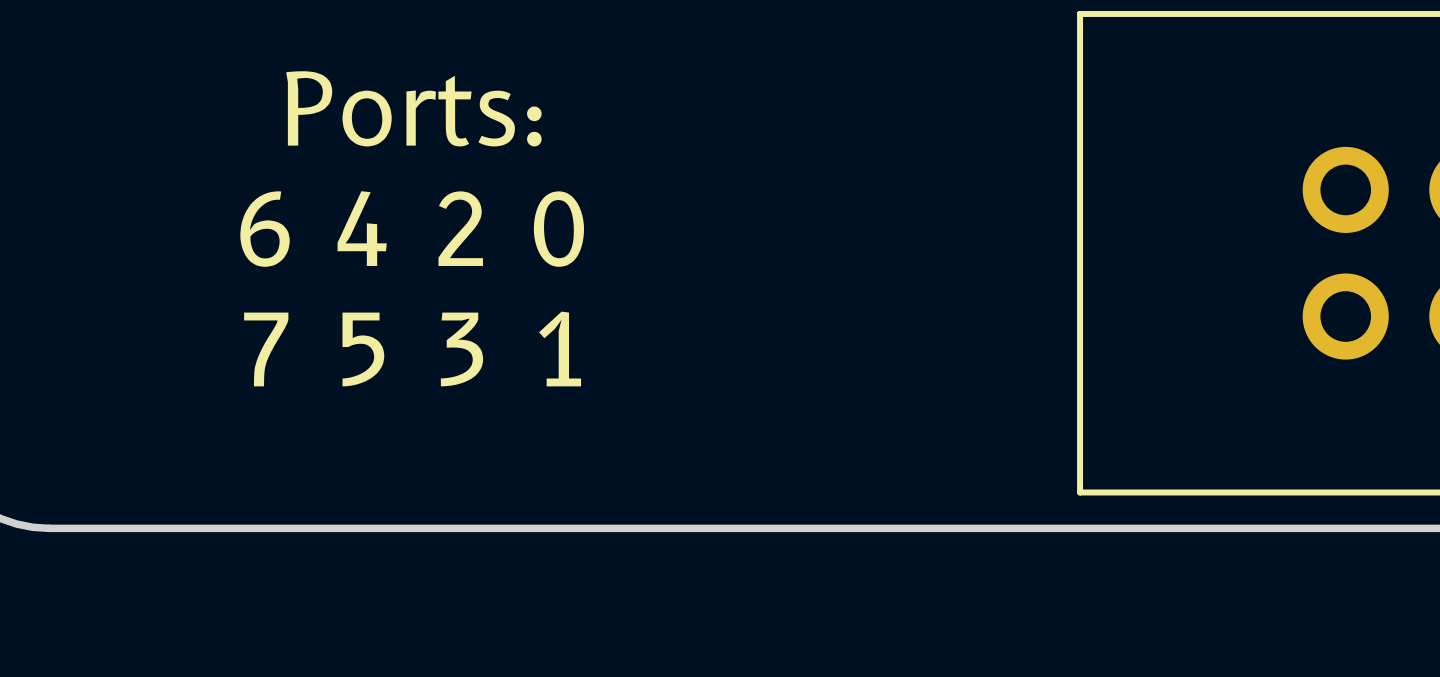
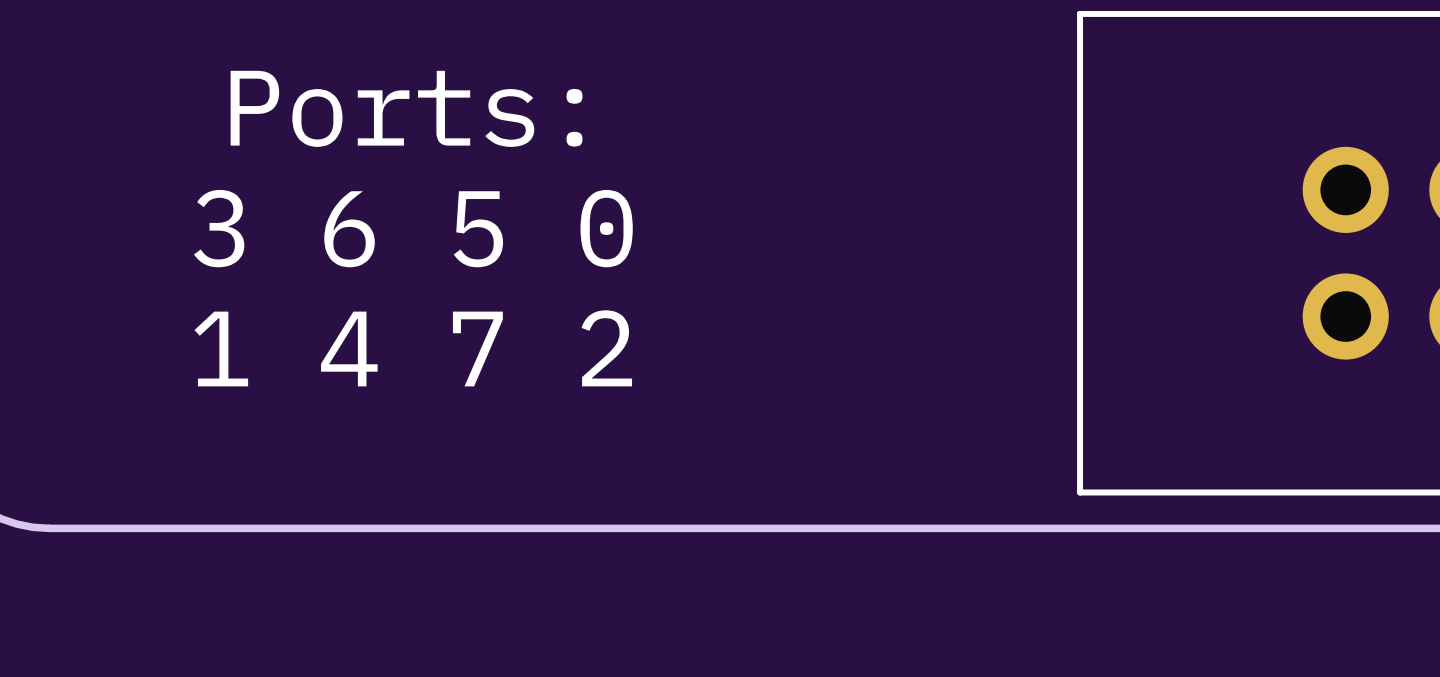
text: 6 4 2 0 (412, 229) -> 3 6 5 0 (413, 228)
text: 7 5 3 1 (412, 348) -> 1 4 7 2 (413, 348)

